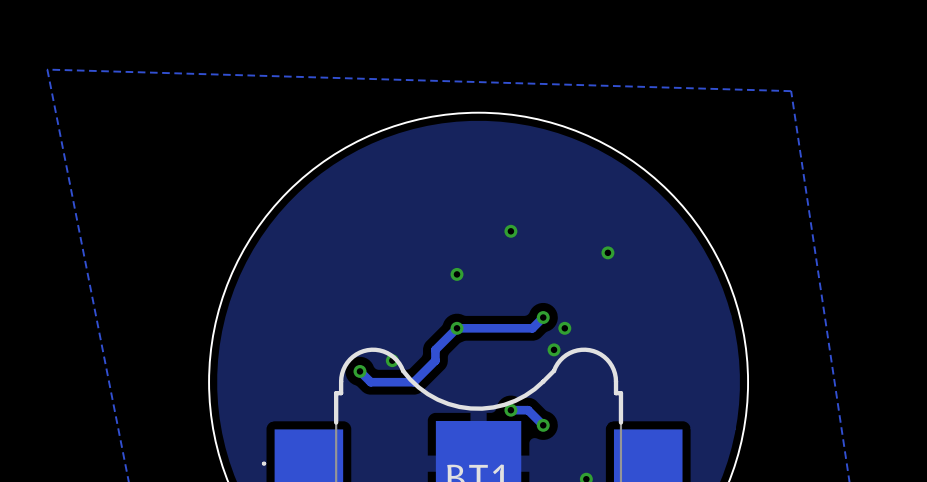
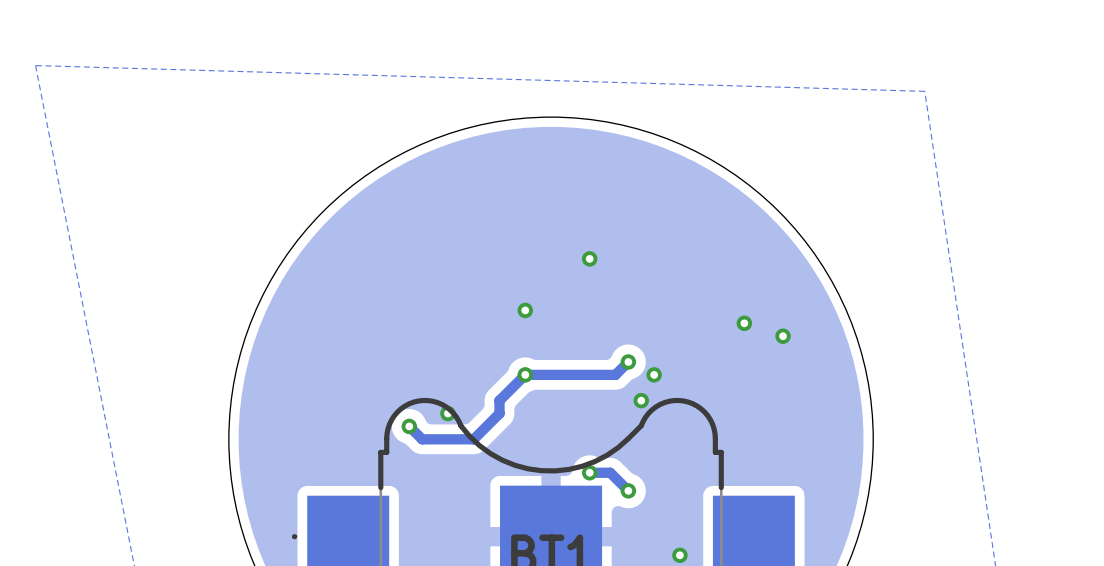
via: (607, 252) -> none
via: none -> (744, 323)
via: none -> (783, 336)

